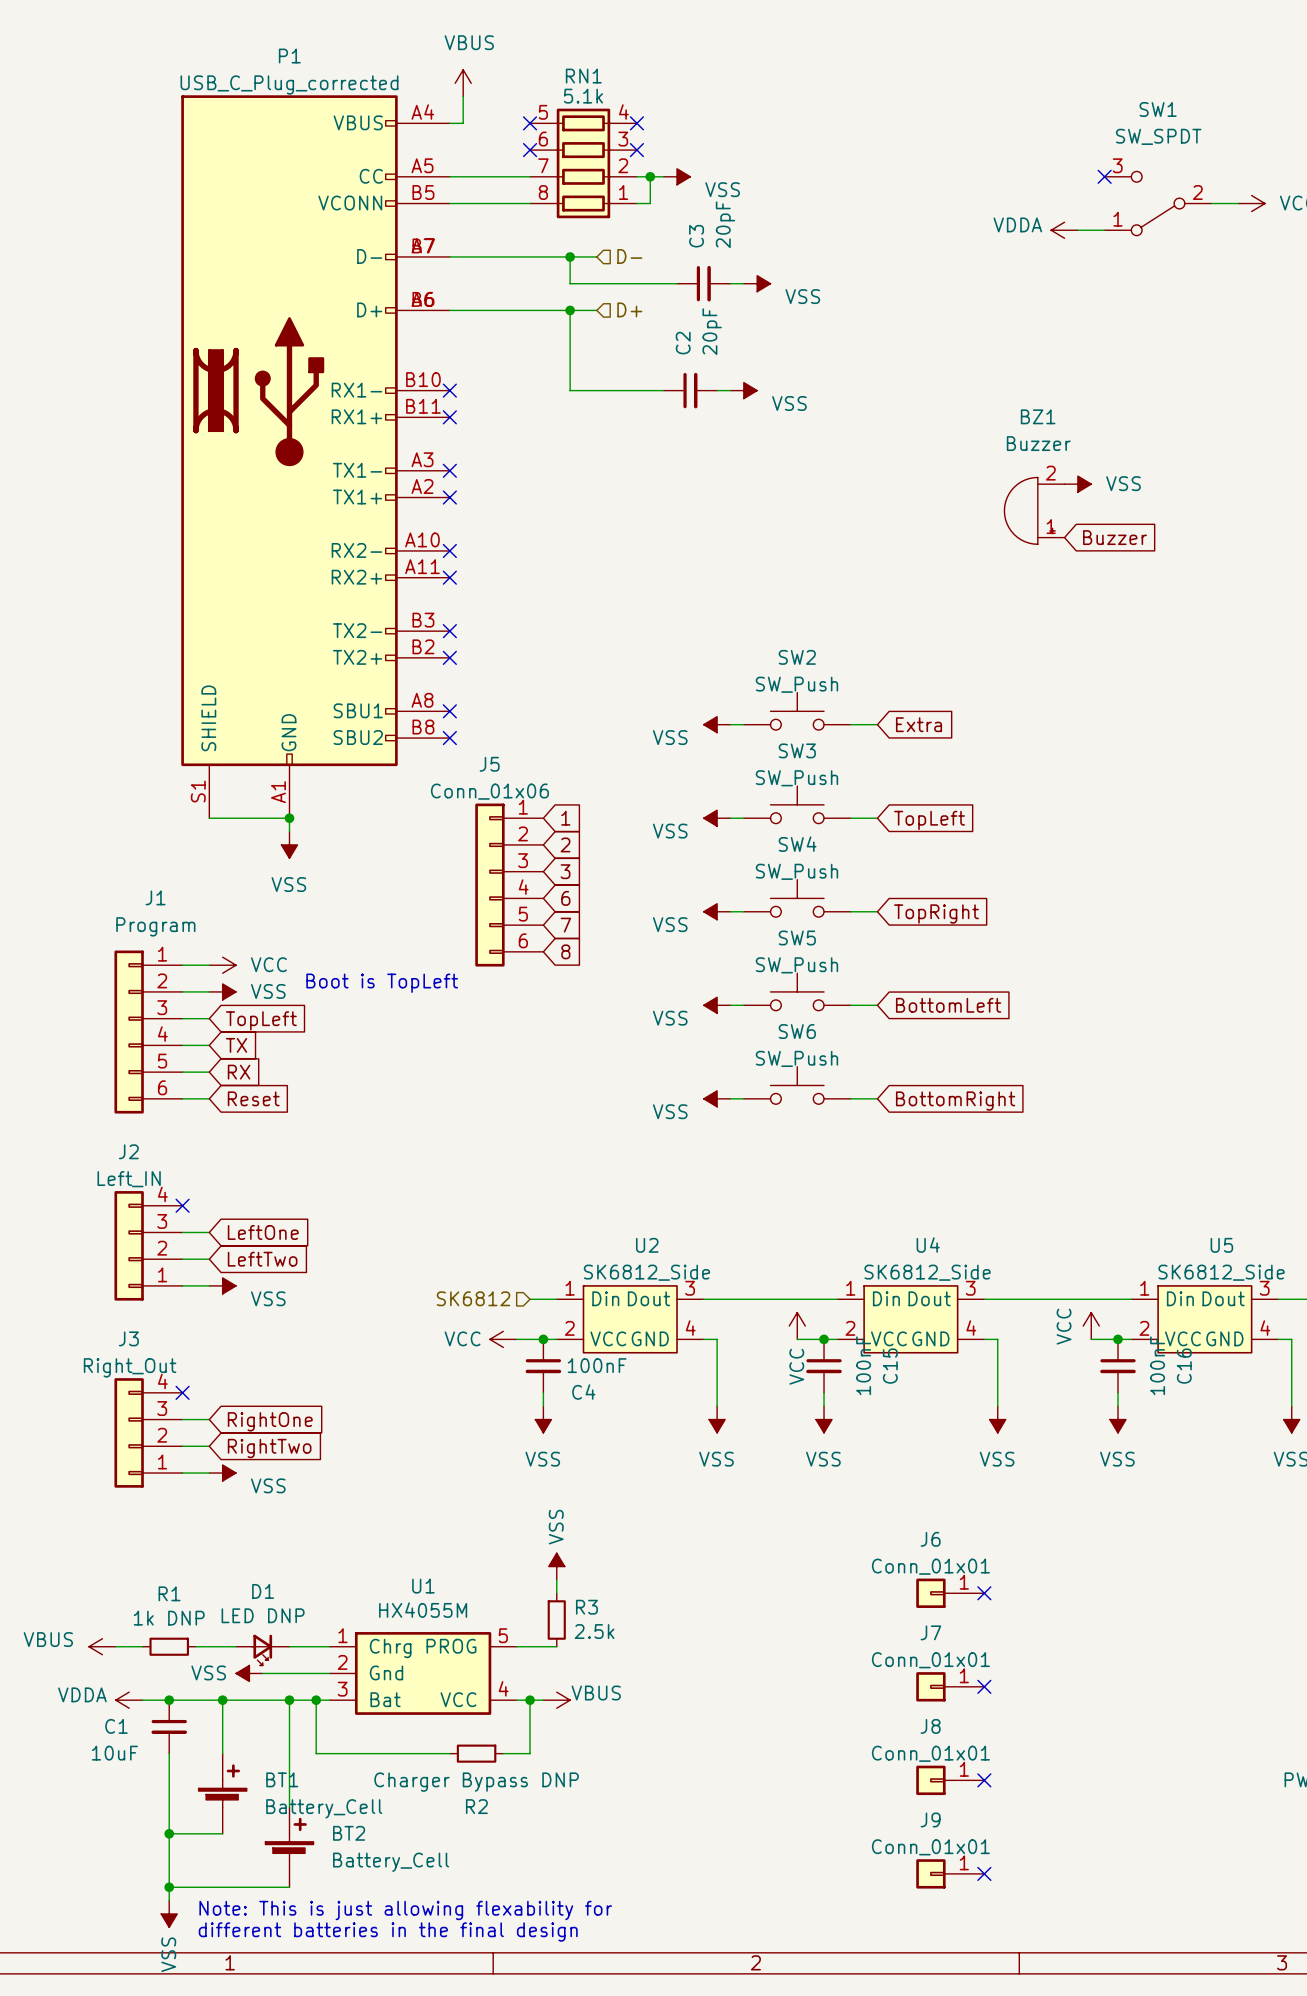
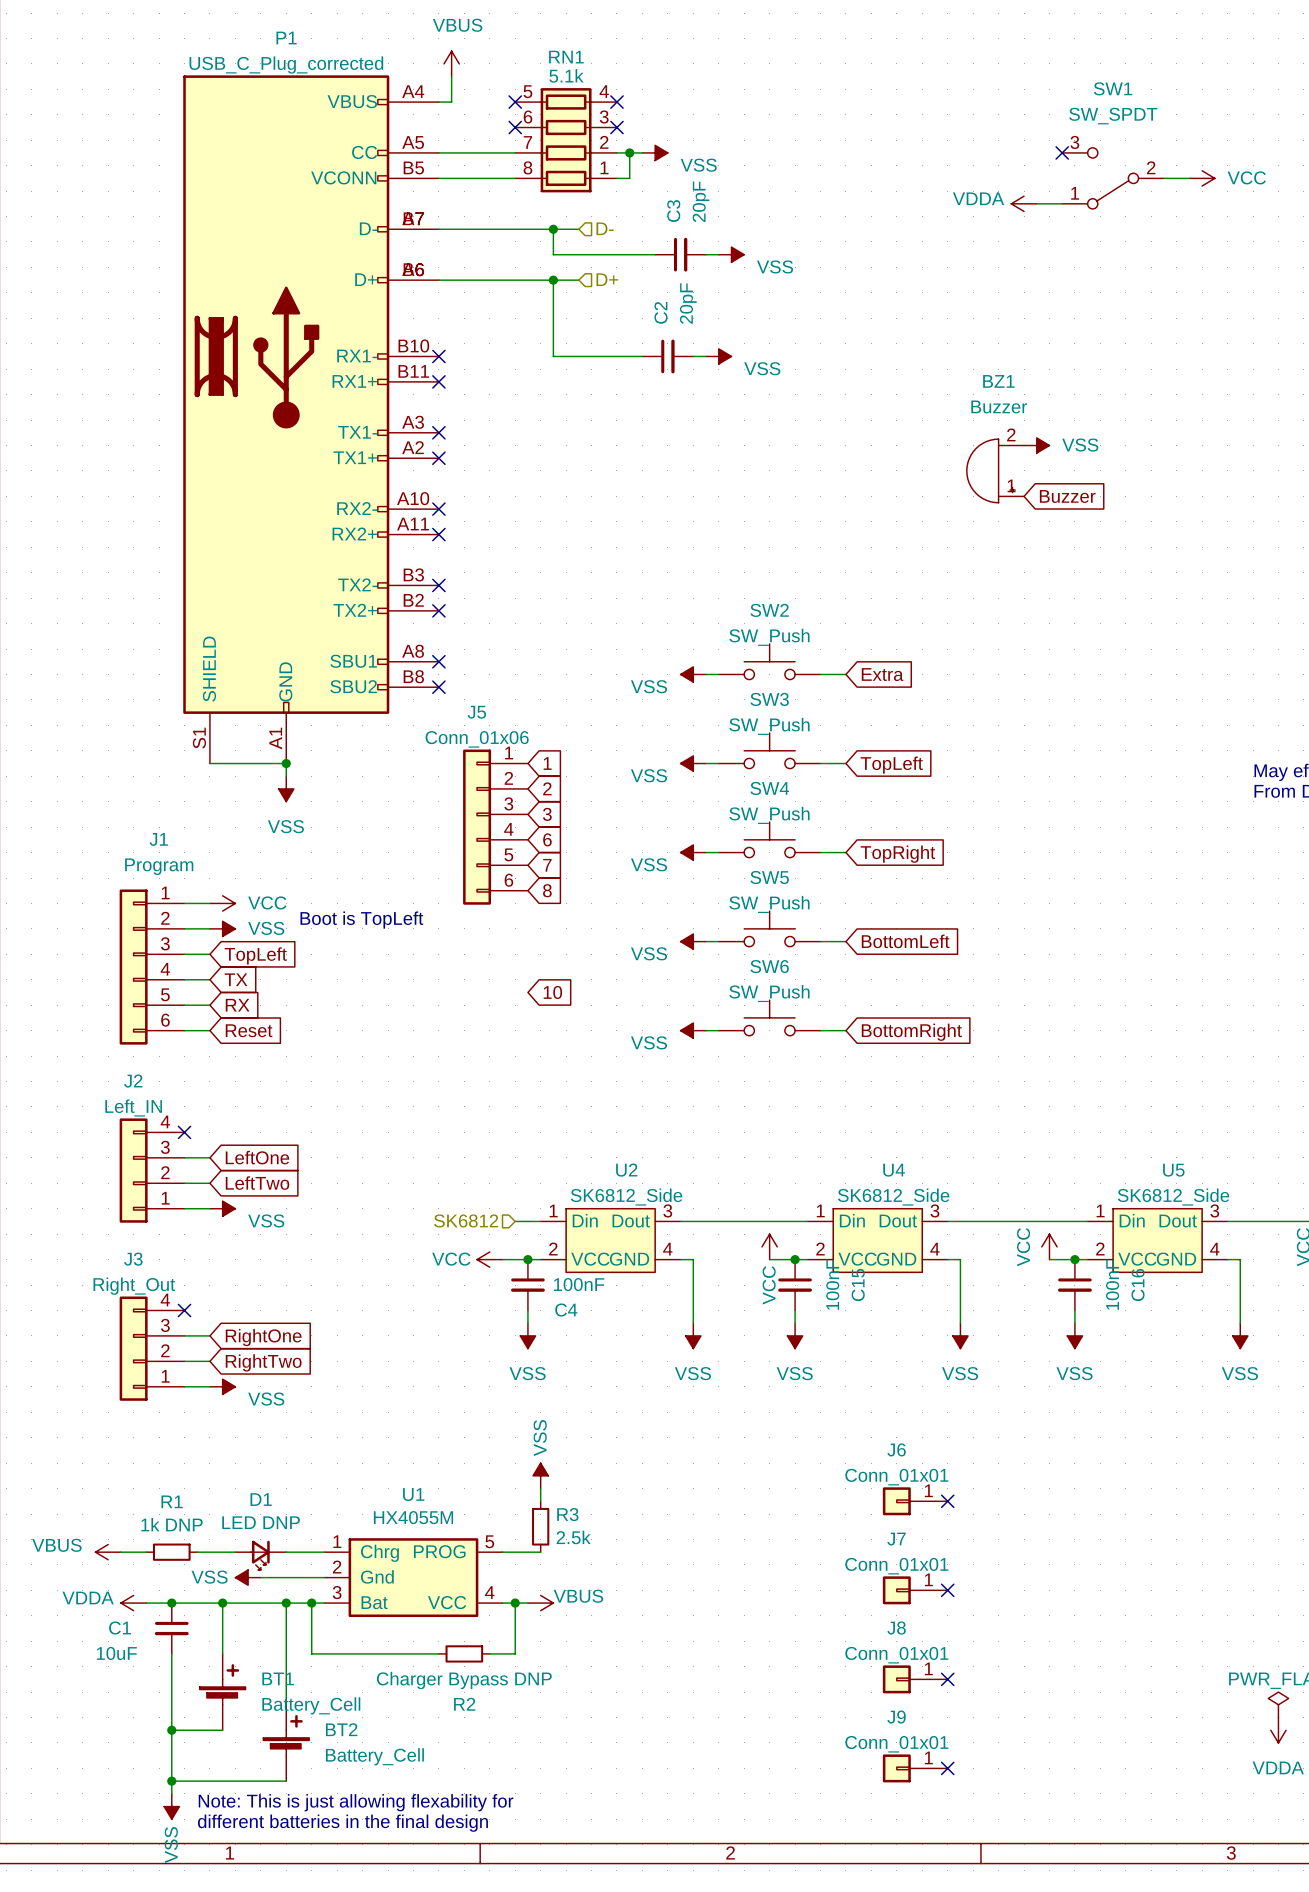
global label: none -> 10 (552, 992)

